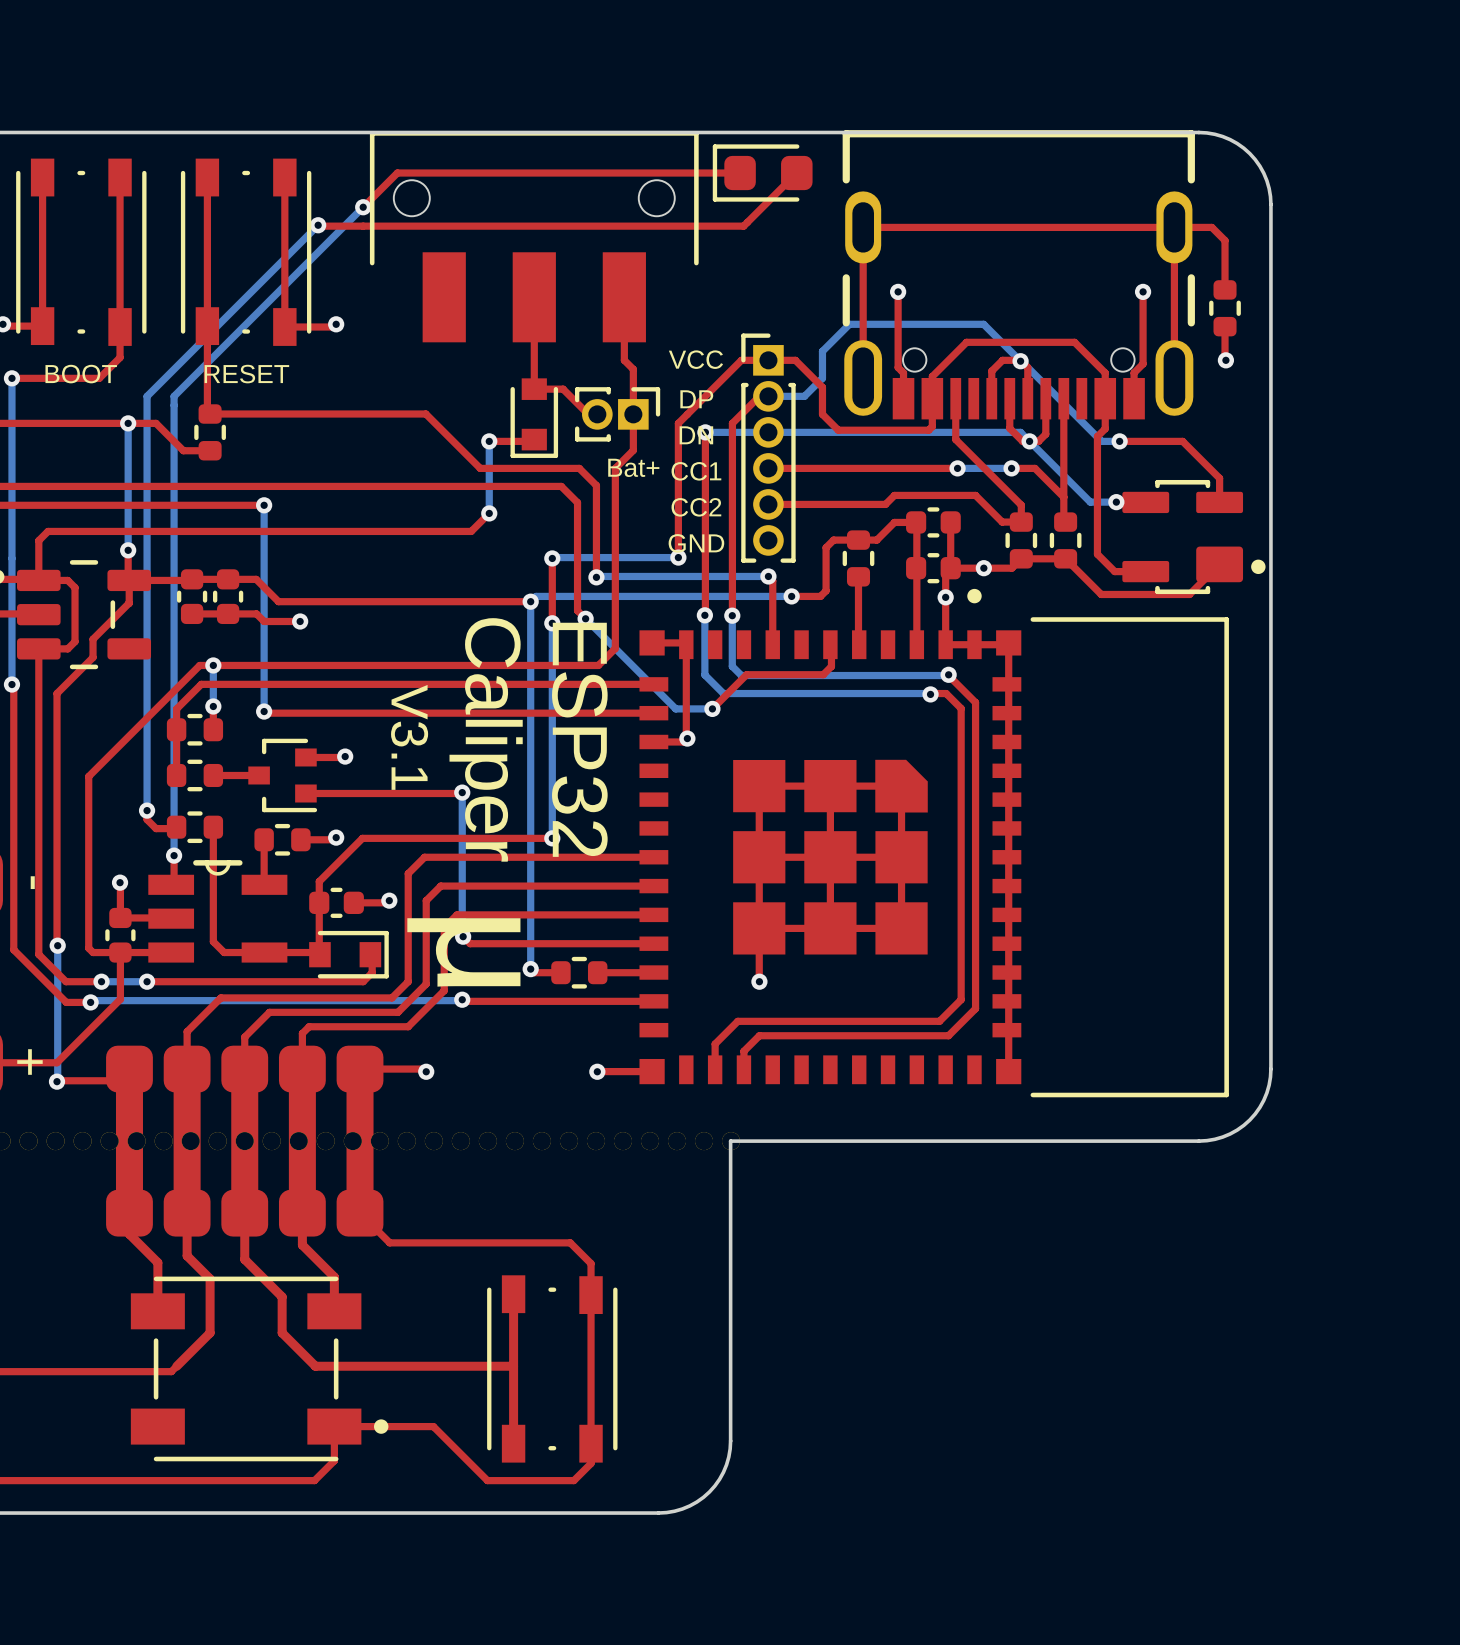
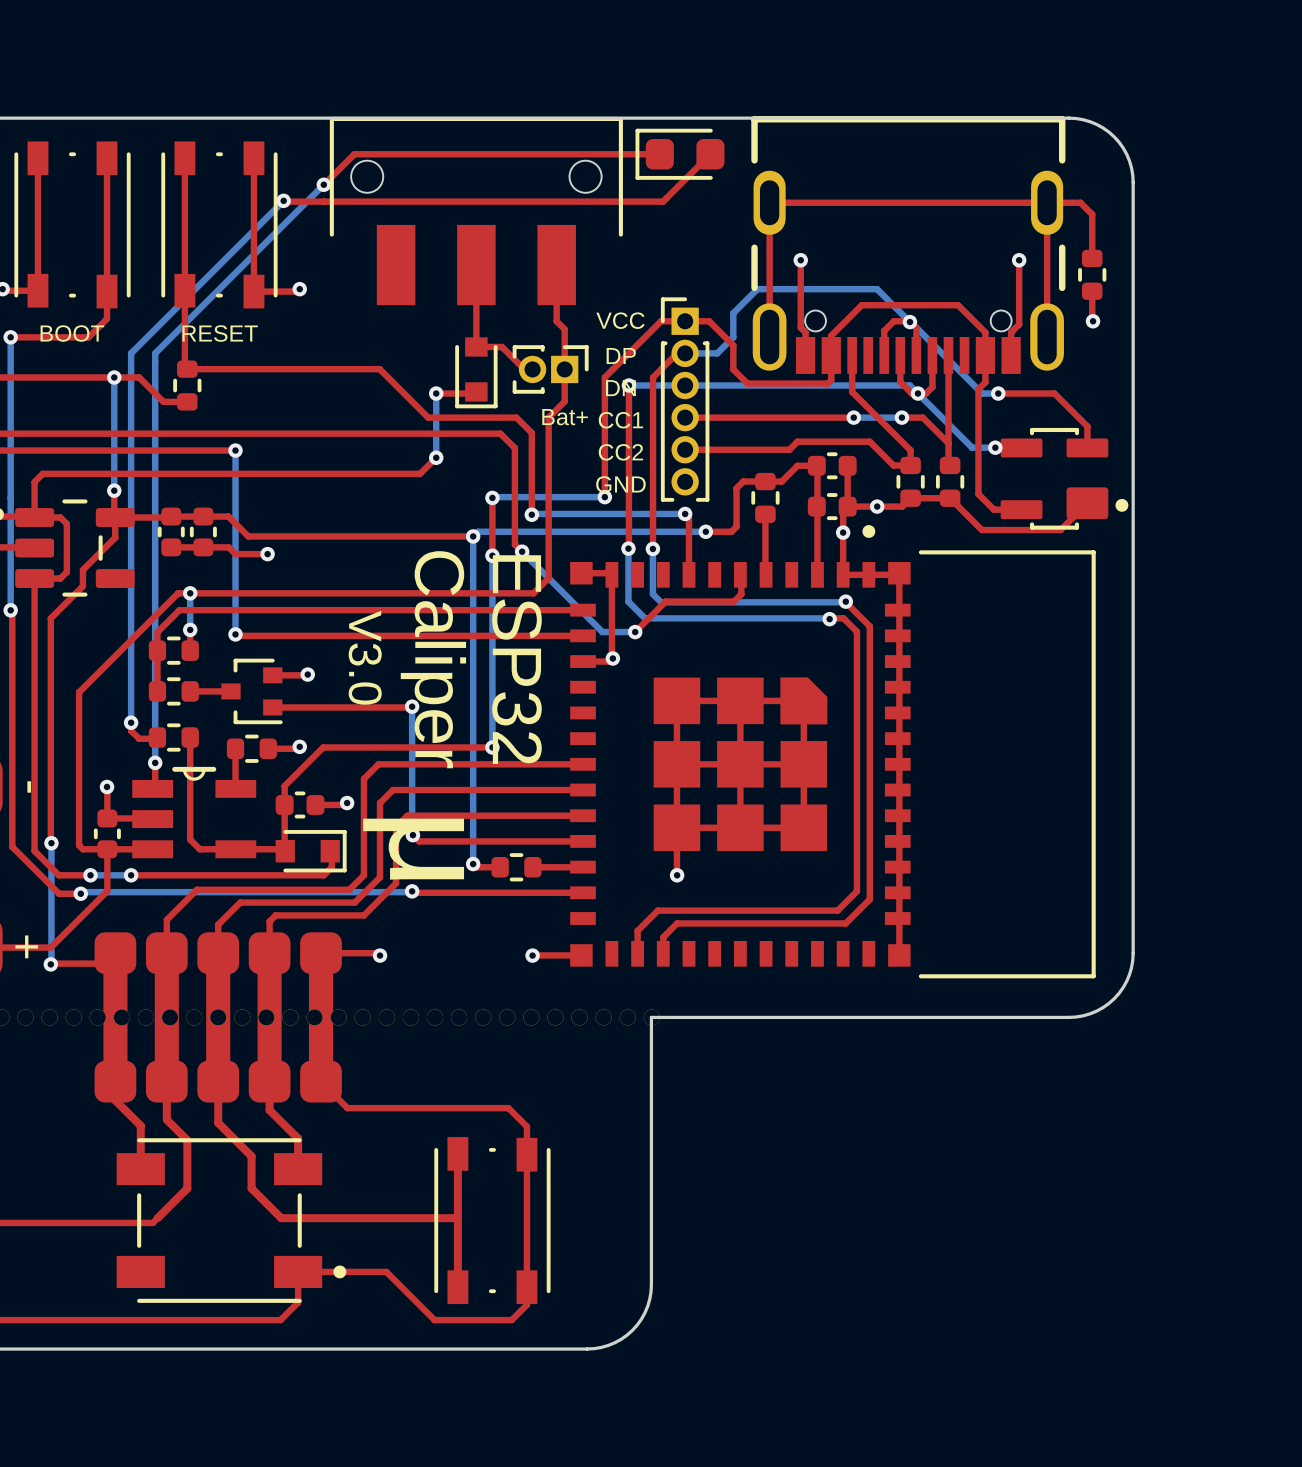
text: V3.1 (409, 737) -> V3.0 (365, 657)

